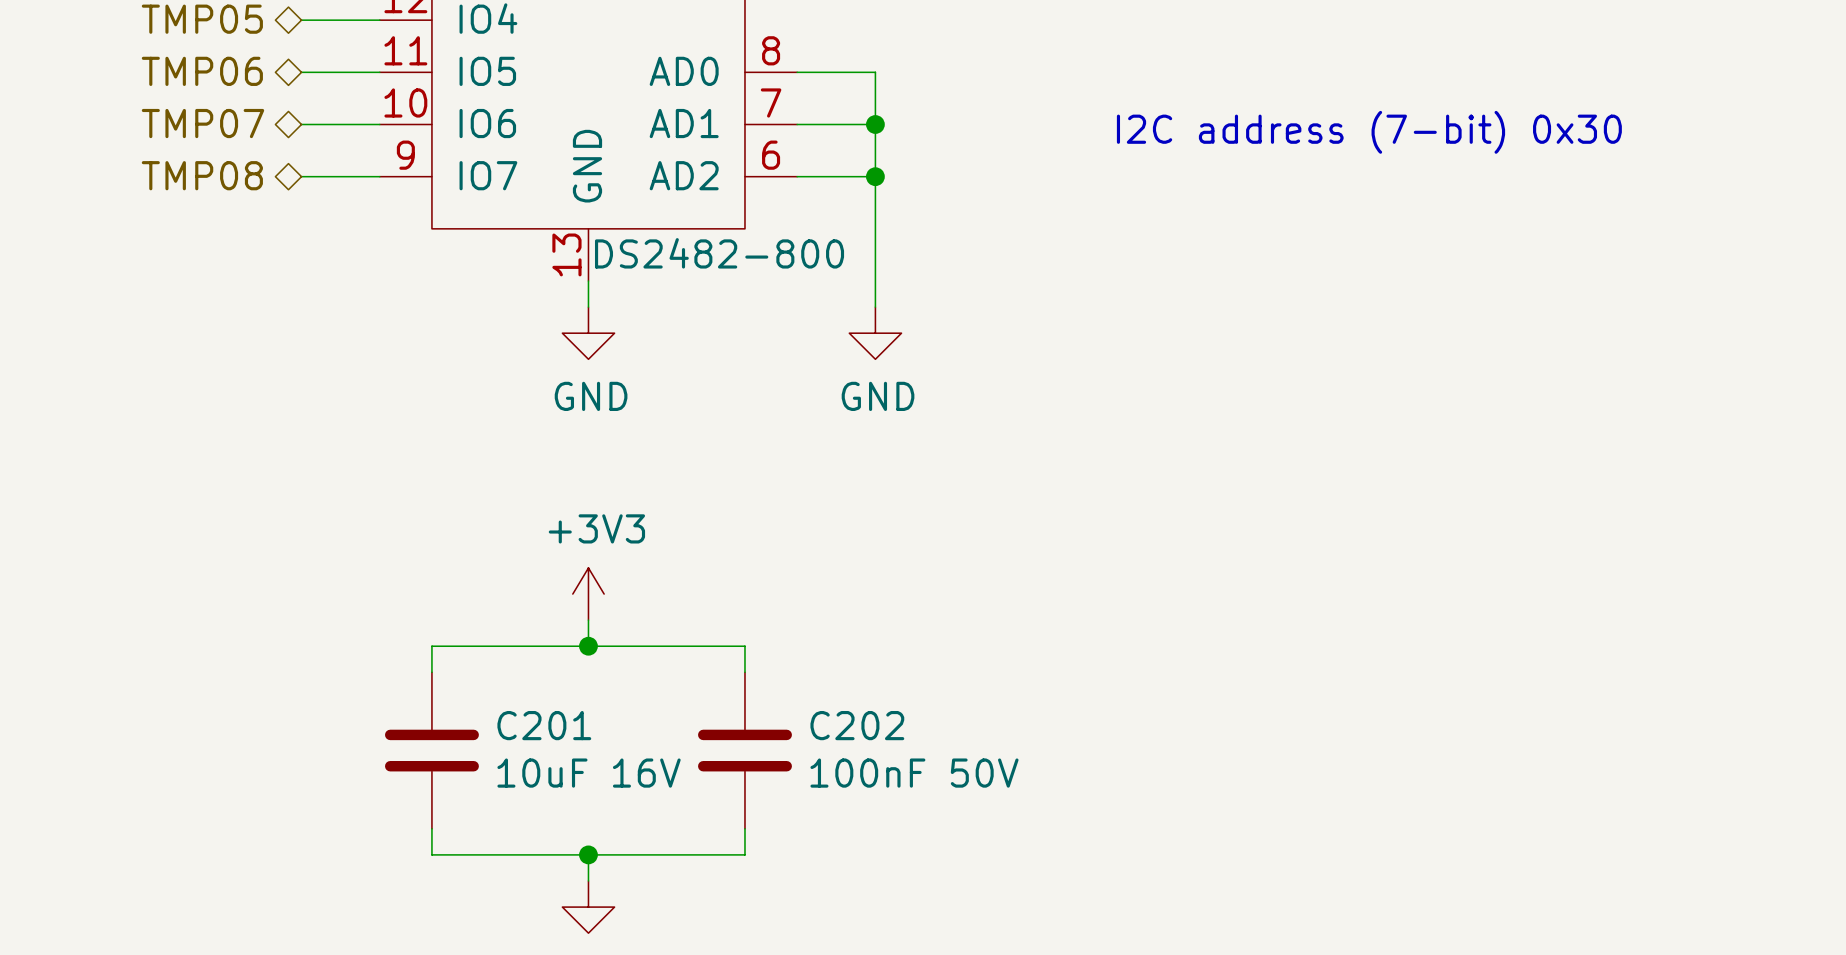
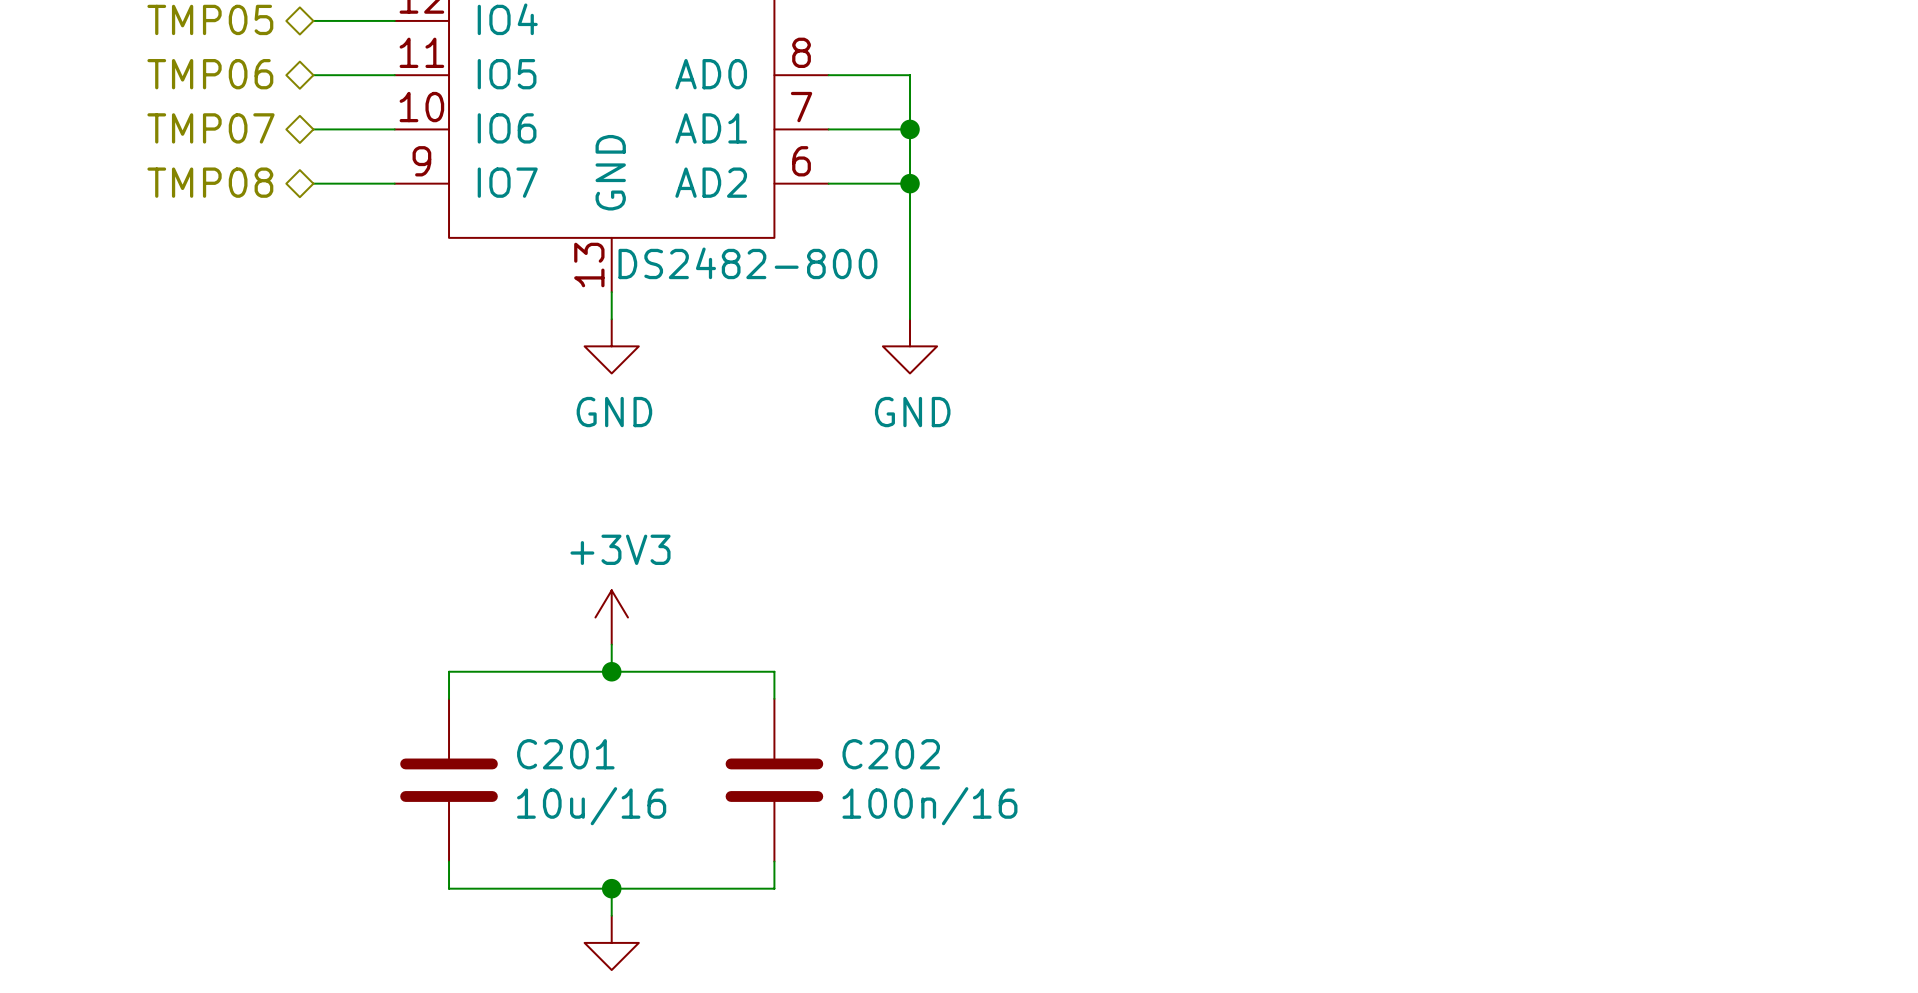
text: I2C address (7-bit) 0x30 (1369, 132) -> none
C201 value: 10uF 16V (589, 773) -> 10u/16 (591, 806)
C202 value: 100nF 50V (914, 773) -> 100n/16 (929, 806)

